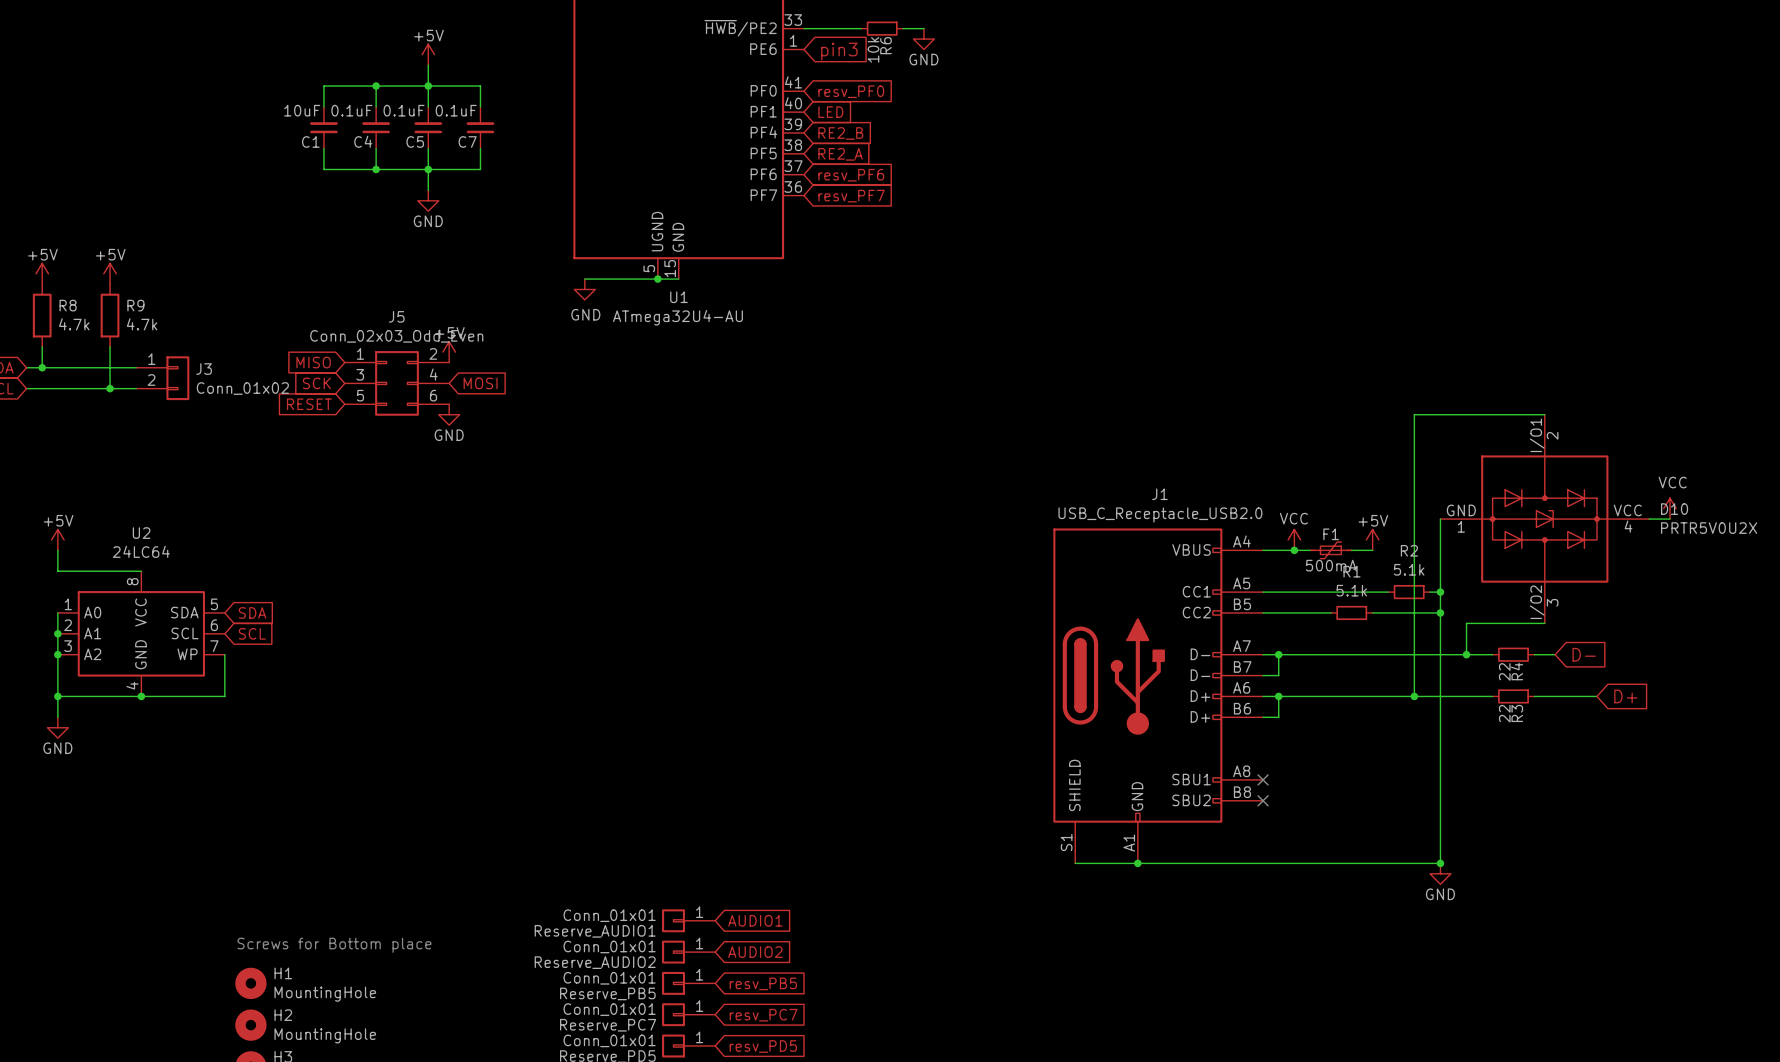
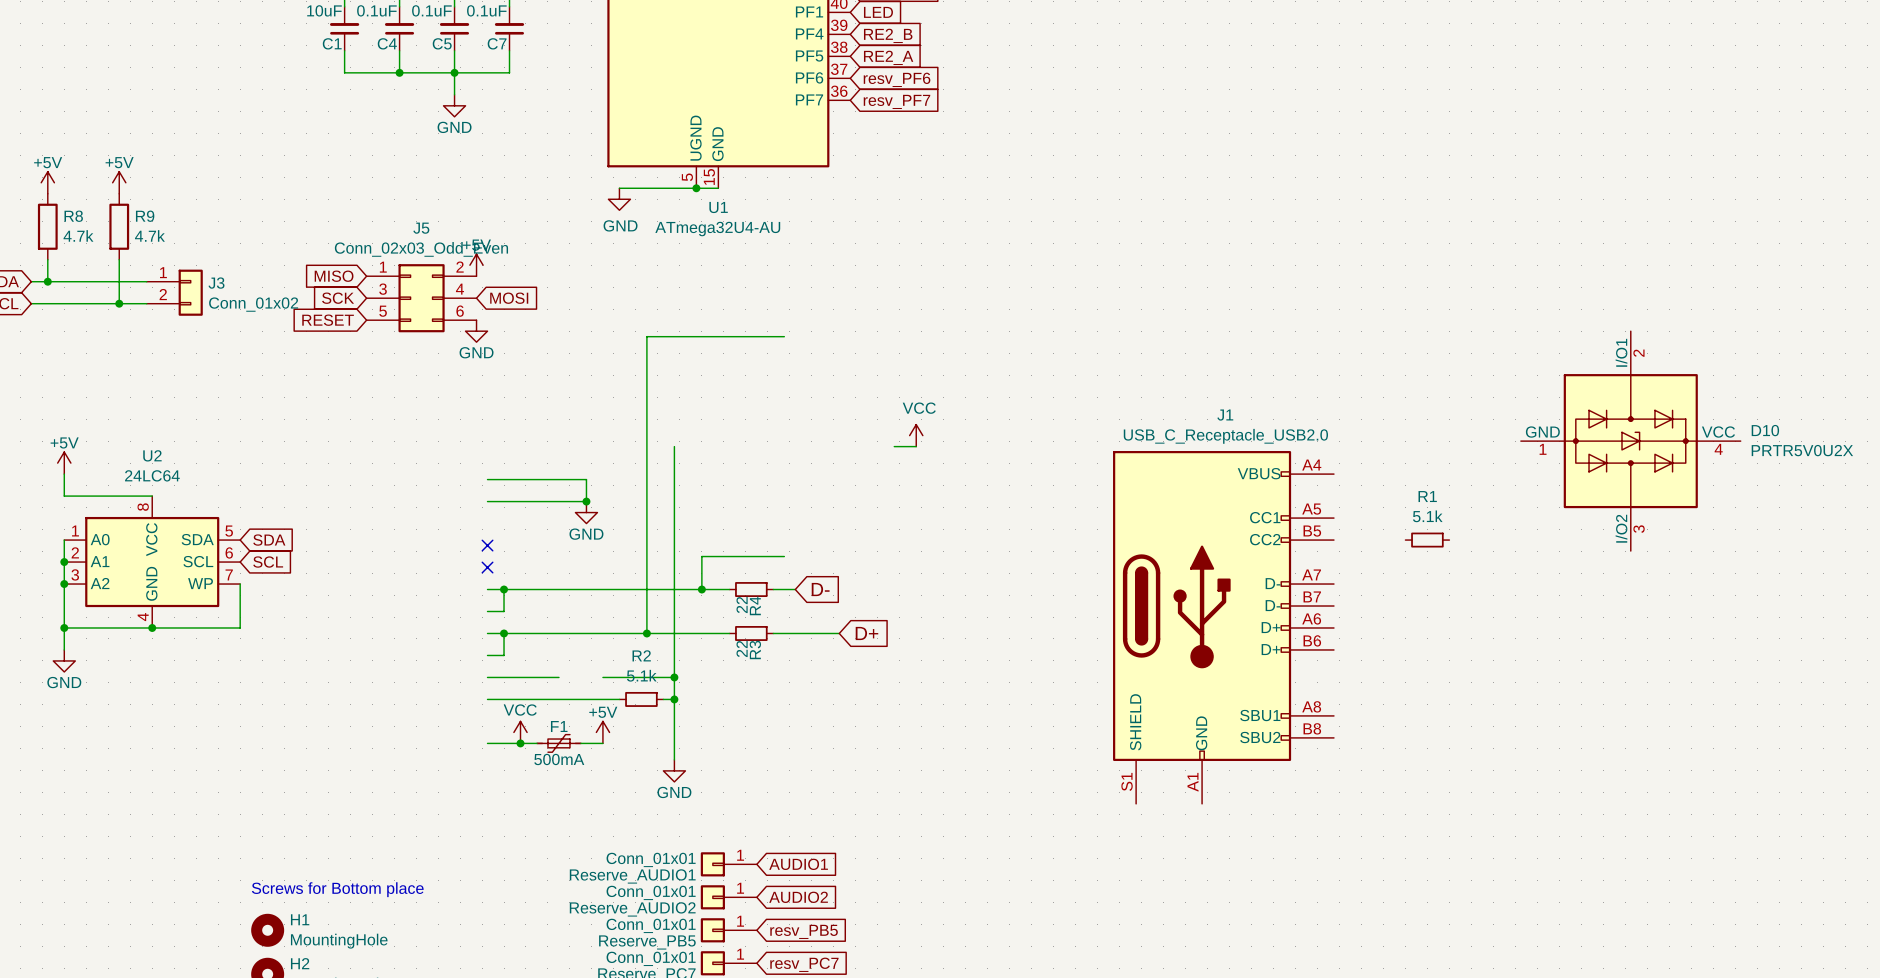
wire: (1544, 414) (1414, 414) (1414, 696) -> none
wire: none -> (784, 336) (646, 336) (646, 633)
power symbol: VCC (1670, 508) -> none
power symbol: none -> VCC (916, 435)
wire: (1440, 519) (1440, 863) (1075, 863) -> none
wire: (1649, 519) (1670, 519) -> none
wire: none -> (674, 446) (674, 759)
wire: none -> (894, 446) (916, 446)
power symbol: VCC (1294, 539) -> none
power symbol: +5V (1372, 539) -> none
wire: (1263, 550) (1310, 550) -> none
junction: (1294, 550) -> none
F1 position: (1330, 550) -> (558, 743)
wire: (1351, 550) (1372, 550) -> none
wire: none -> (487, 479) (586, 479) (586, 501) (487, 501)
junction: none -> (586, 501)
power symbol: none -> GND (586, 512)
wire: (1263, 592) (1388, 592) -> none
R2 position: (1409, 592) -> (641, 699)
wire: (1430, 592) (1440, 592) -> none
junction: (1440, 592) -> none
wire: (1263, 612) (1330, 612) -> none
wire: (1372, 612) (1440, 612) -> none
junction: (1440, 612) -> none
no-connect mark: none -> (487, 545)
wire: (1544, 623) (1466, 623) (1466, 654) -> none
wire: none -> (784, 556) (701, 556) (701, 589)
no-connect mark: none -> (487, 567)
wire: (1263, 654) (1492, 654) -> none
wire: (1278, 654) (1278, 675) (1263, 675) -> none
junction: (1278, 654) -> none
junction: (1466, 654) -> none
R4 position: (1513, 654) -> (751, 589)
wire: (1534, 654) (1555, 654) -> none
global label: D- (1584, 654) -> none
wire: none -> (487, 589) (729, 589)
wire: none -> (504, 589) (504, 611) (487, 611)
junction: none -> (504, 589)
junction: none -> (701, 589)
wire: none -> (773, 589) (795, 589)
global label: none -> D- (820, 589)
wire: (1263, 696) (1492, 696) -> none
wire: (1278, 696) (1278, 717) (1263, 717) -> none
junction: (1278, 696) -> none
junction: (1414, 696) -> none
R3 position: (1513, 696) -> (751, 633)
wire: (1534, 696) (1596, 696) -> none
global label: D+ (1625, 696) -> none
wire: none -> (487, 633) (729, 633)
wire: none -> (504, 633) (504, 655) (487, 655)
junction: none -> (504, 633)
junction: none -> (646, 633)
wire: none -> (773, 633) (839, 633)
global label: none -> D+ (866, 633)
wire: none -> (487, 677) (558, 677)
wire: none -> (602, 677) (674, 677)
junction: none -> (674, 677)
wire: none -> (487, 699) (619, 699)
wire: none -> (663, 699) (674, 699)
junction: none -> (674, 699)
no-connect mark: (1263, 779) -> none
power symbol: none -> VCC (520, 732)
power symbol: none -> +5V (602, 732)
no-connect mark: (1263, 800) -> none
wire: none -> (487, 743) (536, 743)
junction: none -> (520, 743)
wire: none -> (580, 743) (602, 743)
power symbol: none -> GND (674, 770)
junction: (1137, 863) -> none
junction: (1440, 863) -> none
power symbol: GND (1440, 873) -> none

